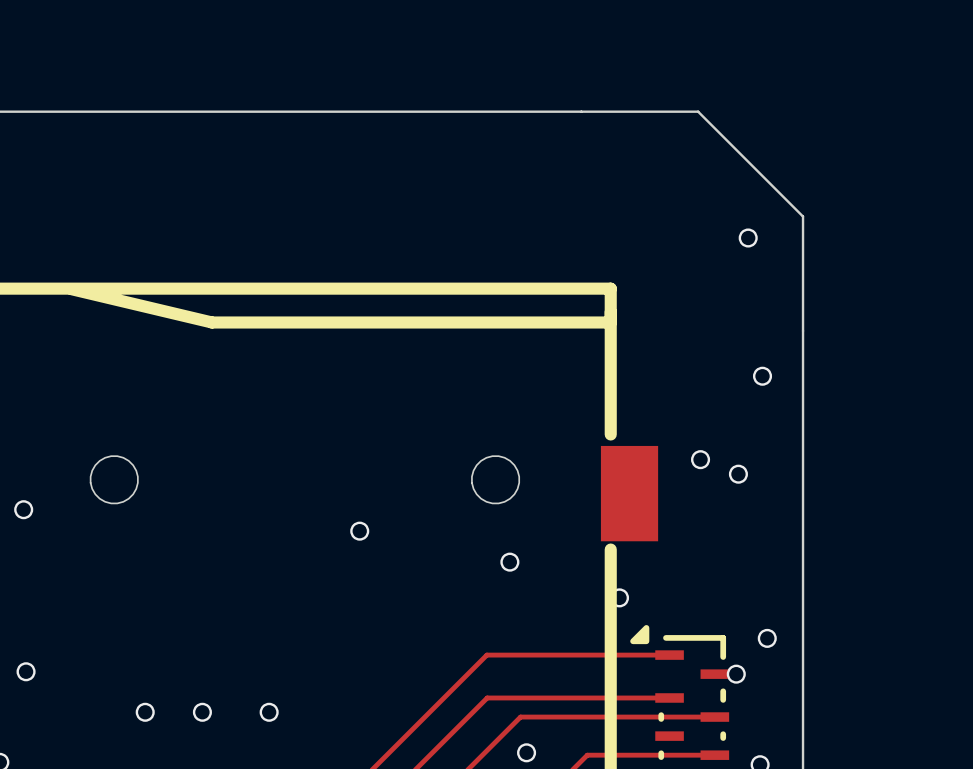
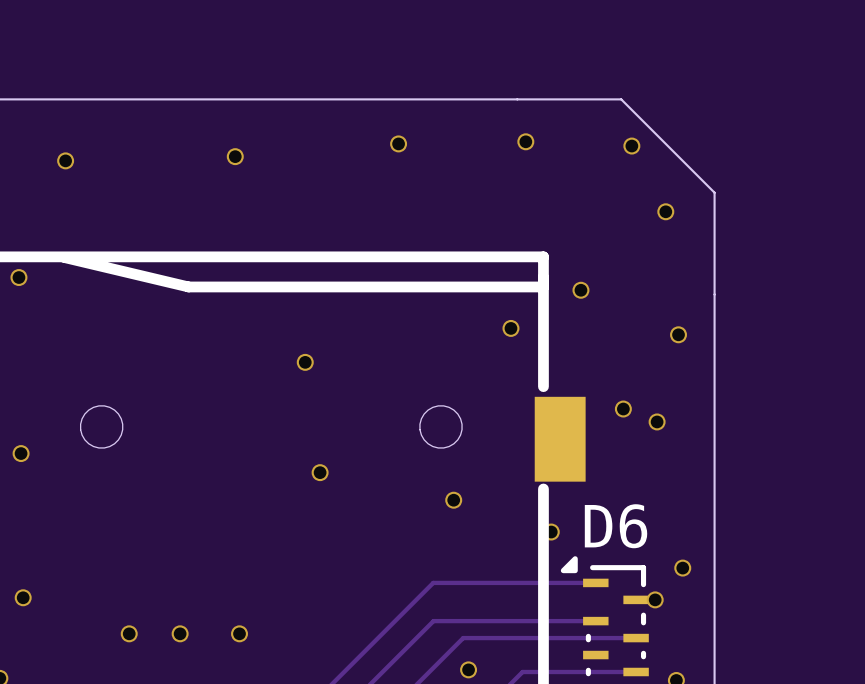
via: none -> (525, 141)
via: none -> (398, 143)
via: none -> (631, 146)
via: none -> (235, 156)
via: none -> (65, 160)
via: none -> (18, 277)
via: none -> (580, 290)
via: none -> (510, 328)
via: none -> (305, 362)
D6 name: none -> D6 (616, 526)

